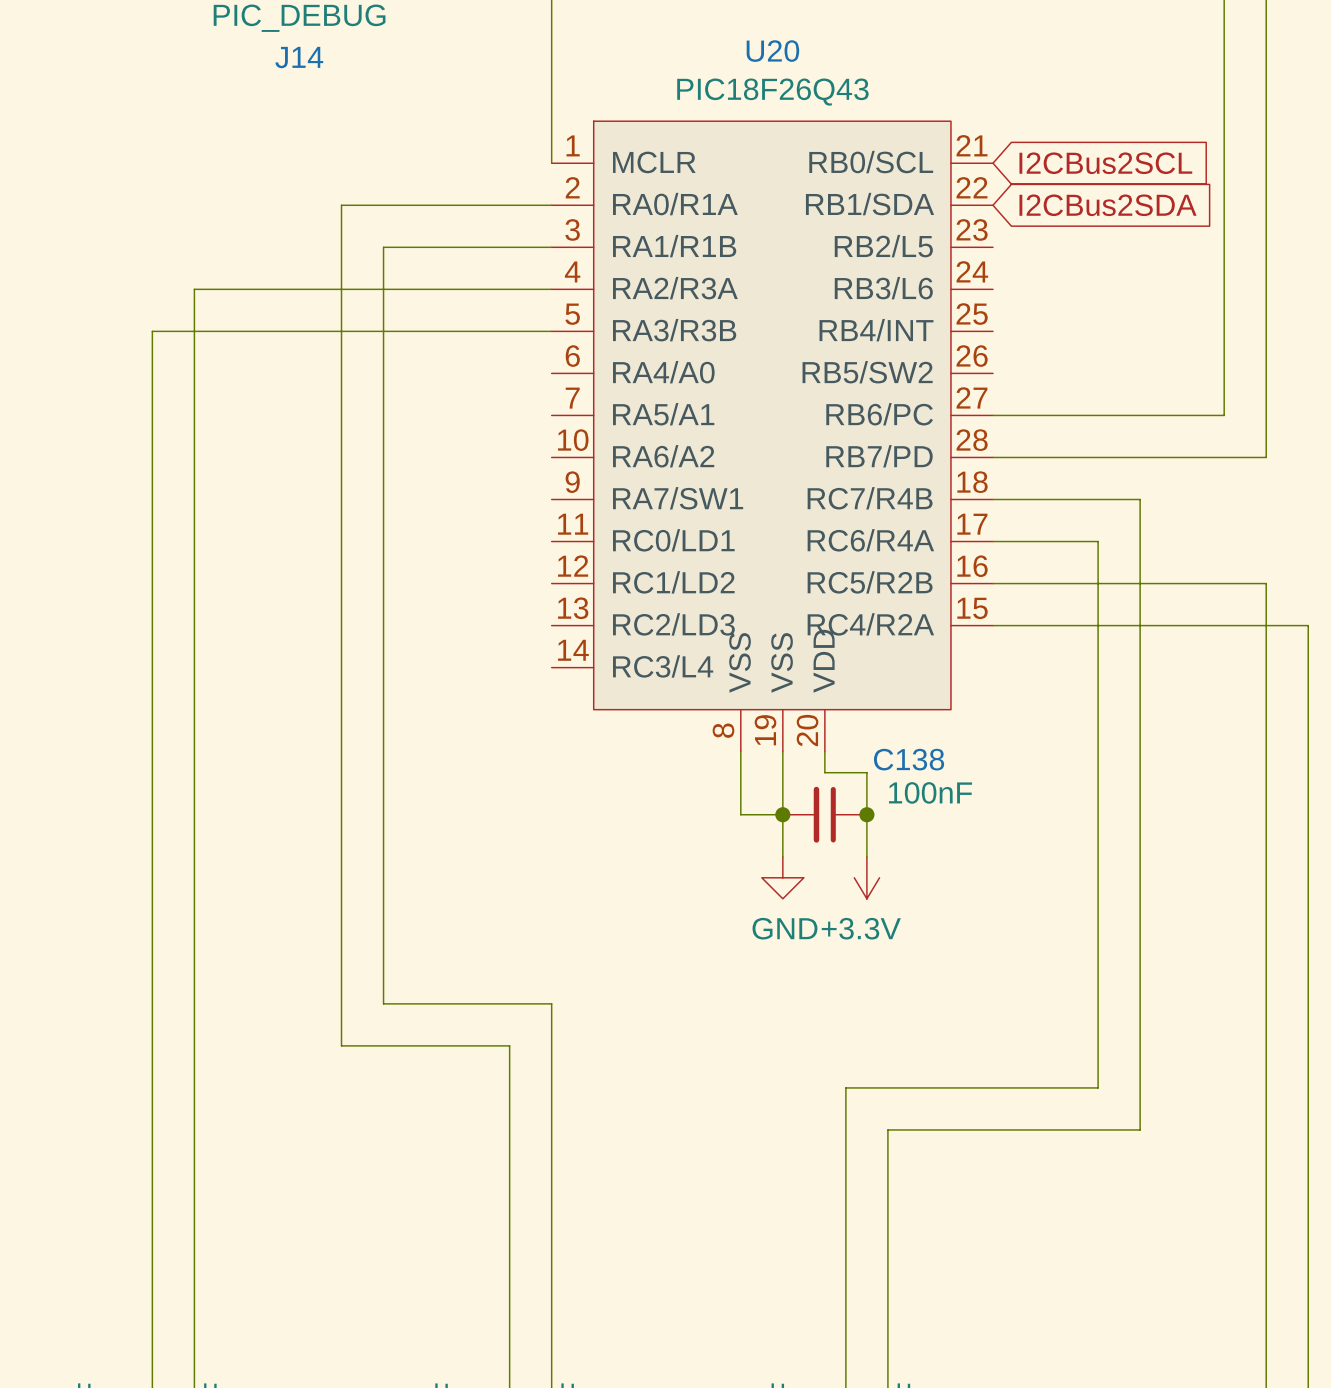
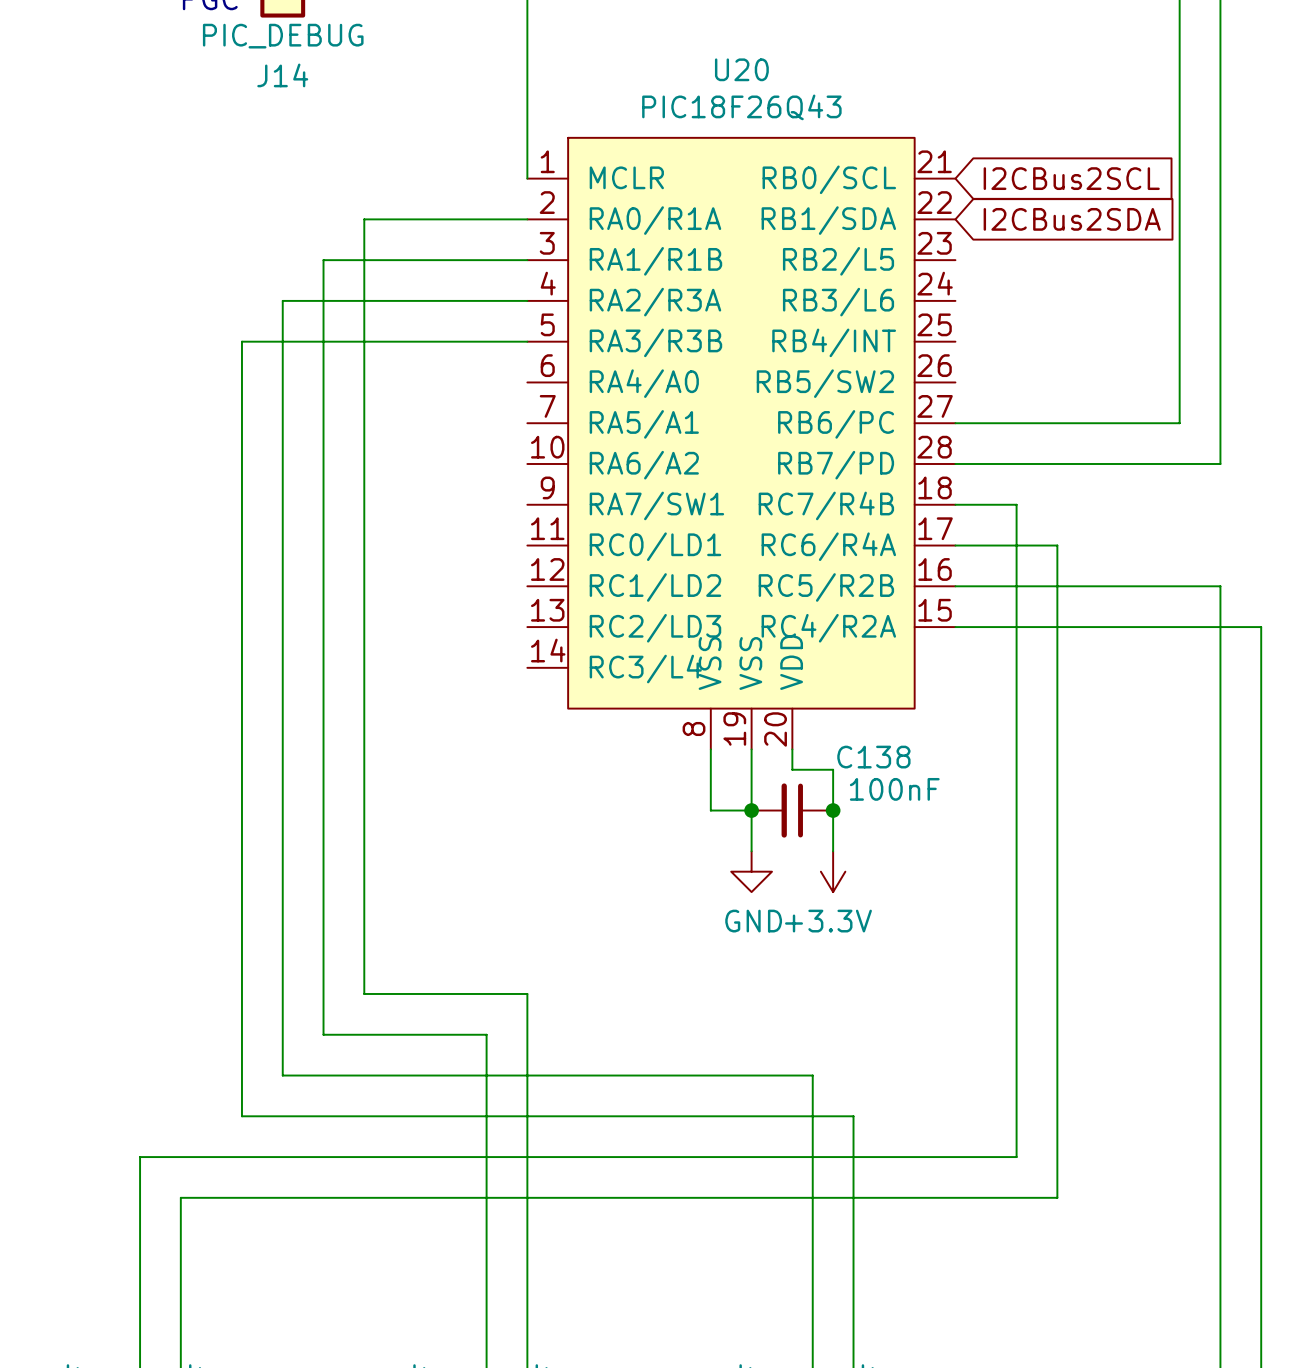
wire: (383, 205) (341, 205) (341, 247) -> (364, 219) (364, 260) (323, 260)
wire: (299, 289) (194, 289) (194, 1214) -> (282, 300) (282, 1075) (812, 1075)
wire: (257, 331) (152, 331) (152, 1172) -> (241, 341) (241, 1116) (853, 1116)
wire: (1056, 499) (1140, 499) (1140, 1129) (887, 1129) -> (1016, 504) (1016, 1157) (140, 1157)
wire: (845, 1087) (1098, 1087) -> (180, 1197) (1057, 1197) (1057, 1075)

